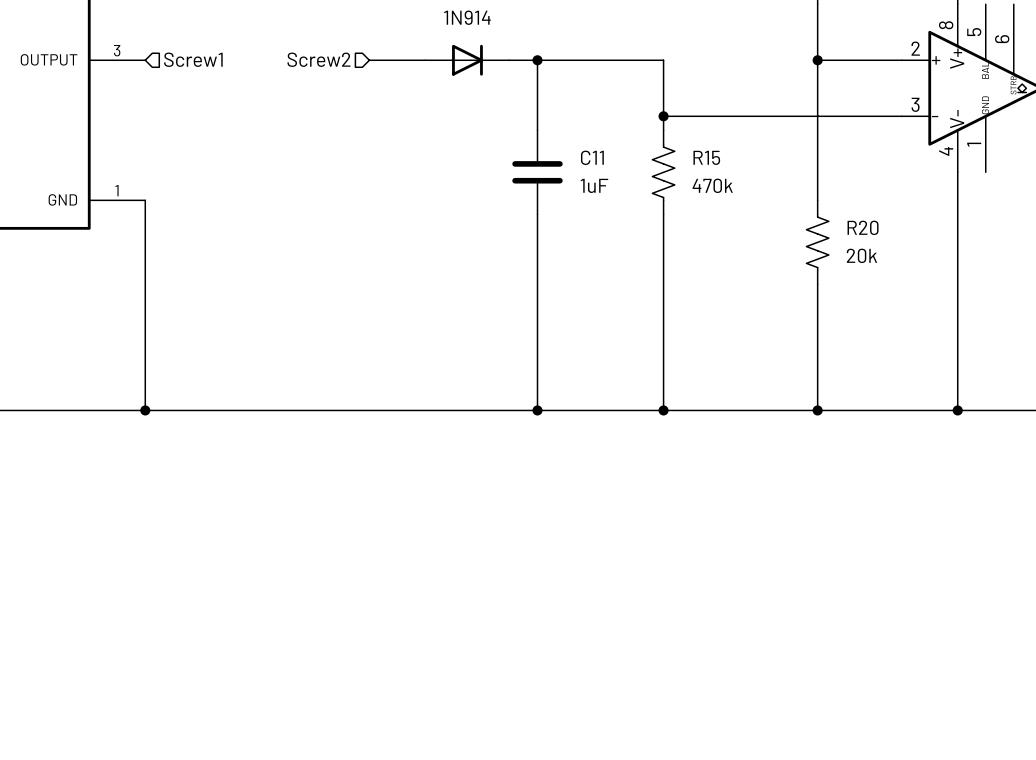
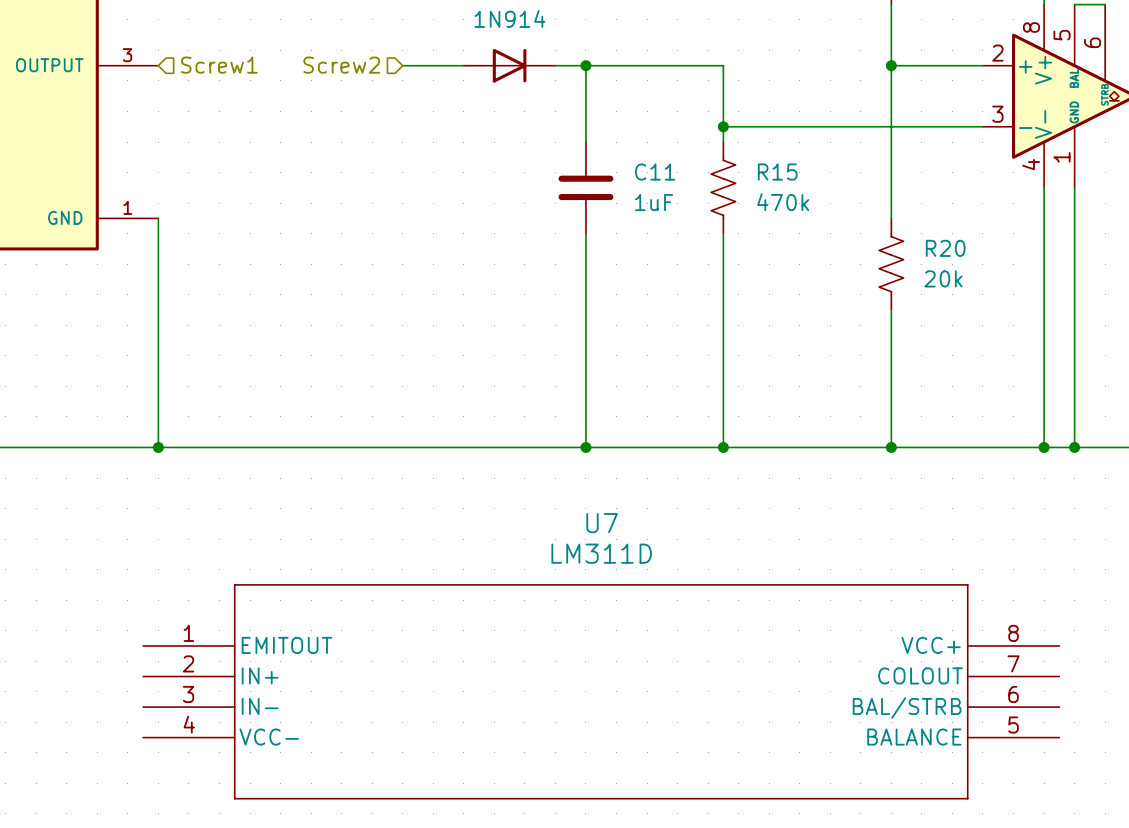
wire: none -> (1074, 4) (1105, 4)
wire: none -> (1074, 187) (1074, 447)
junction: none -> (1074, 447)
U7: none -> LM311D (601, 691)

